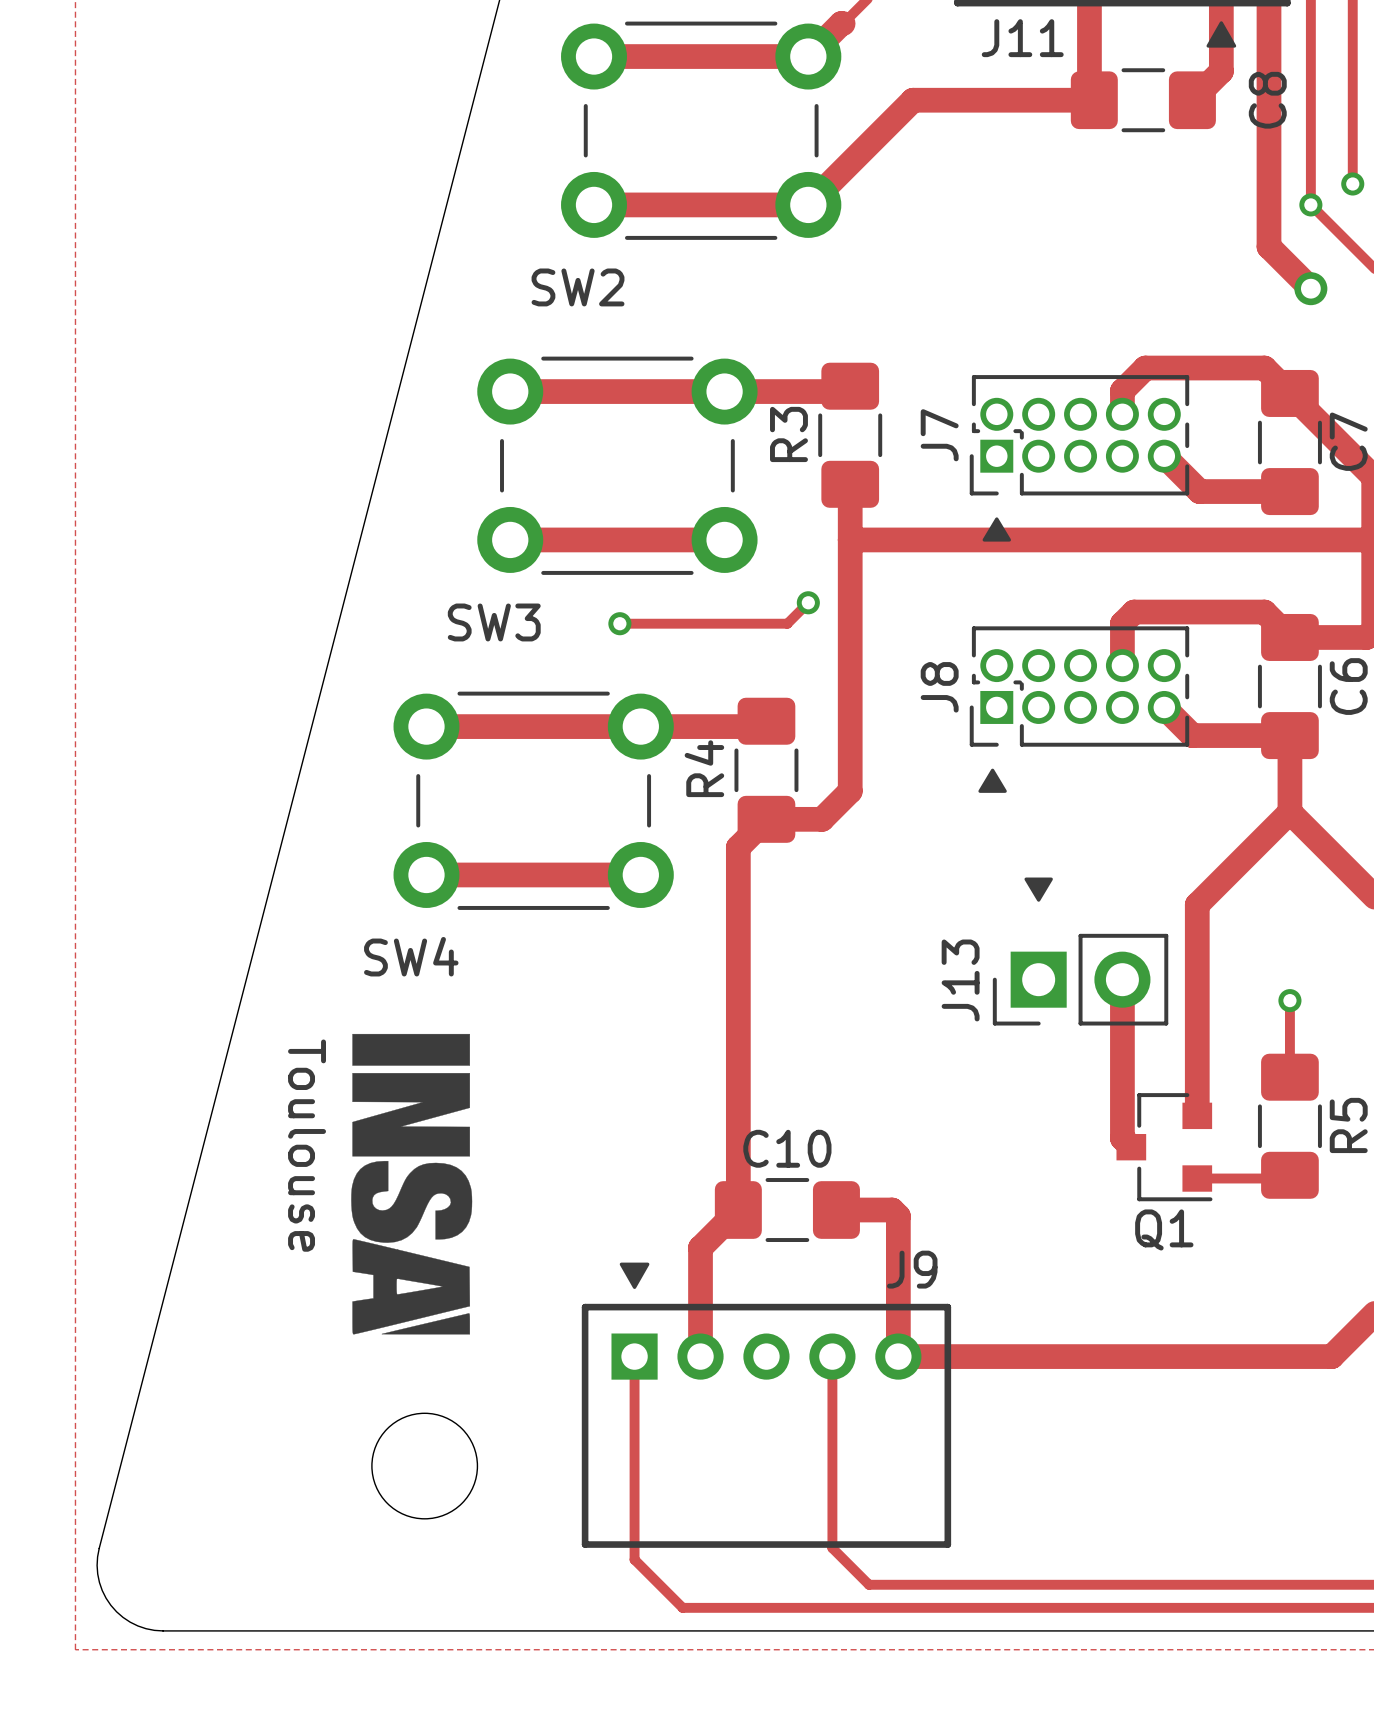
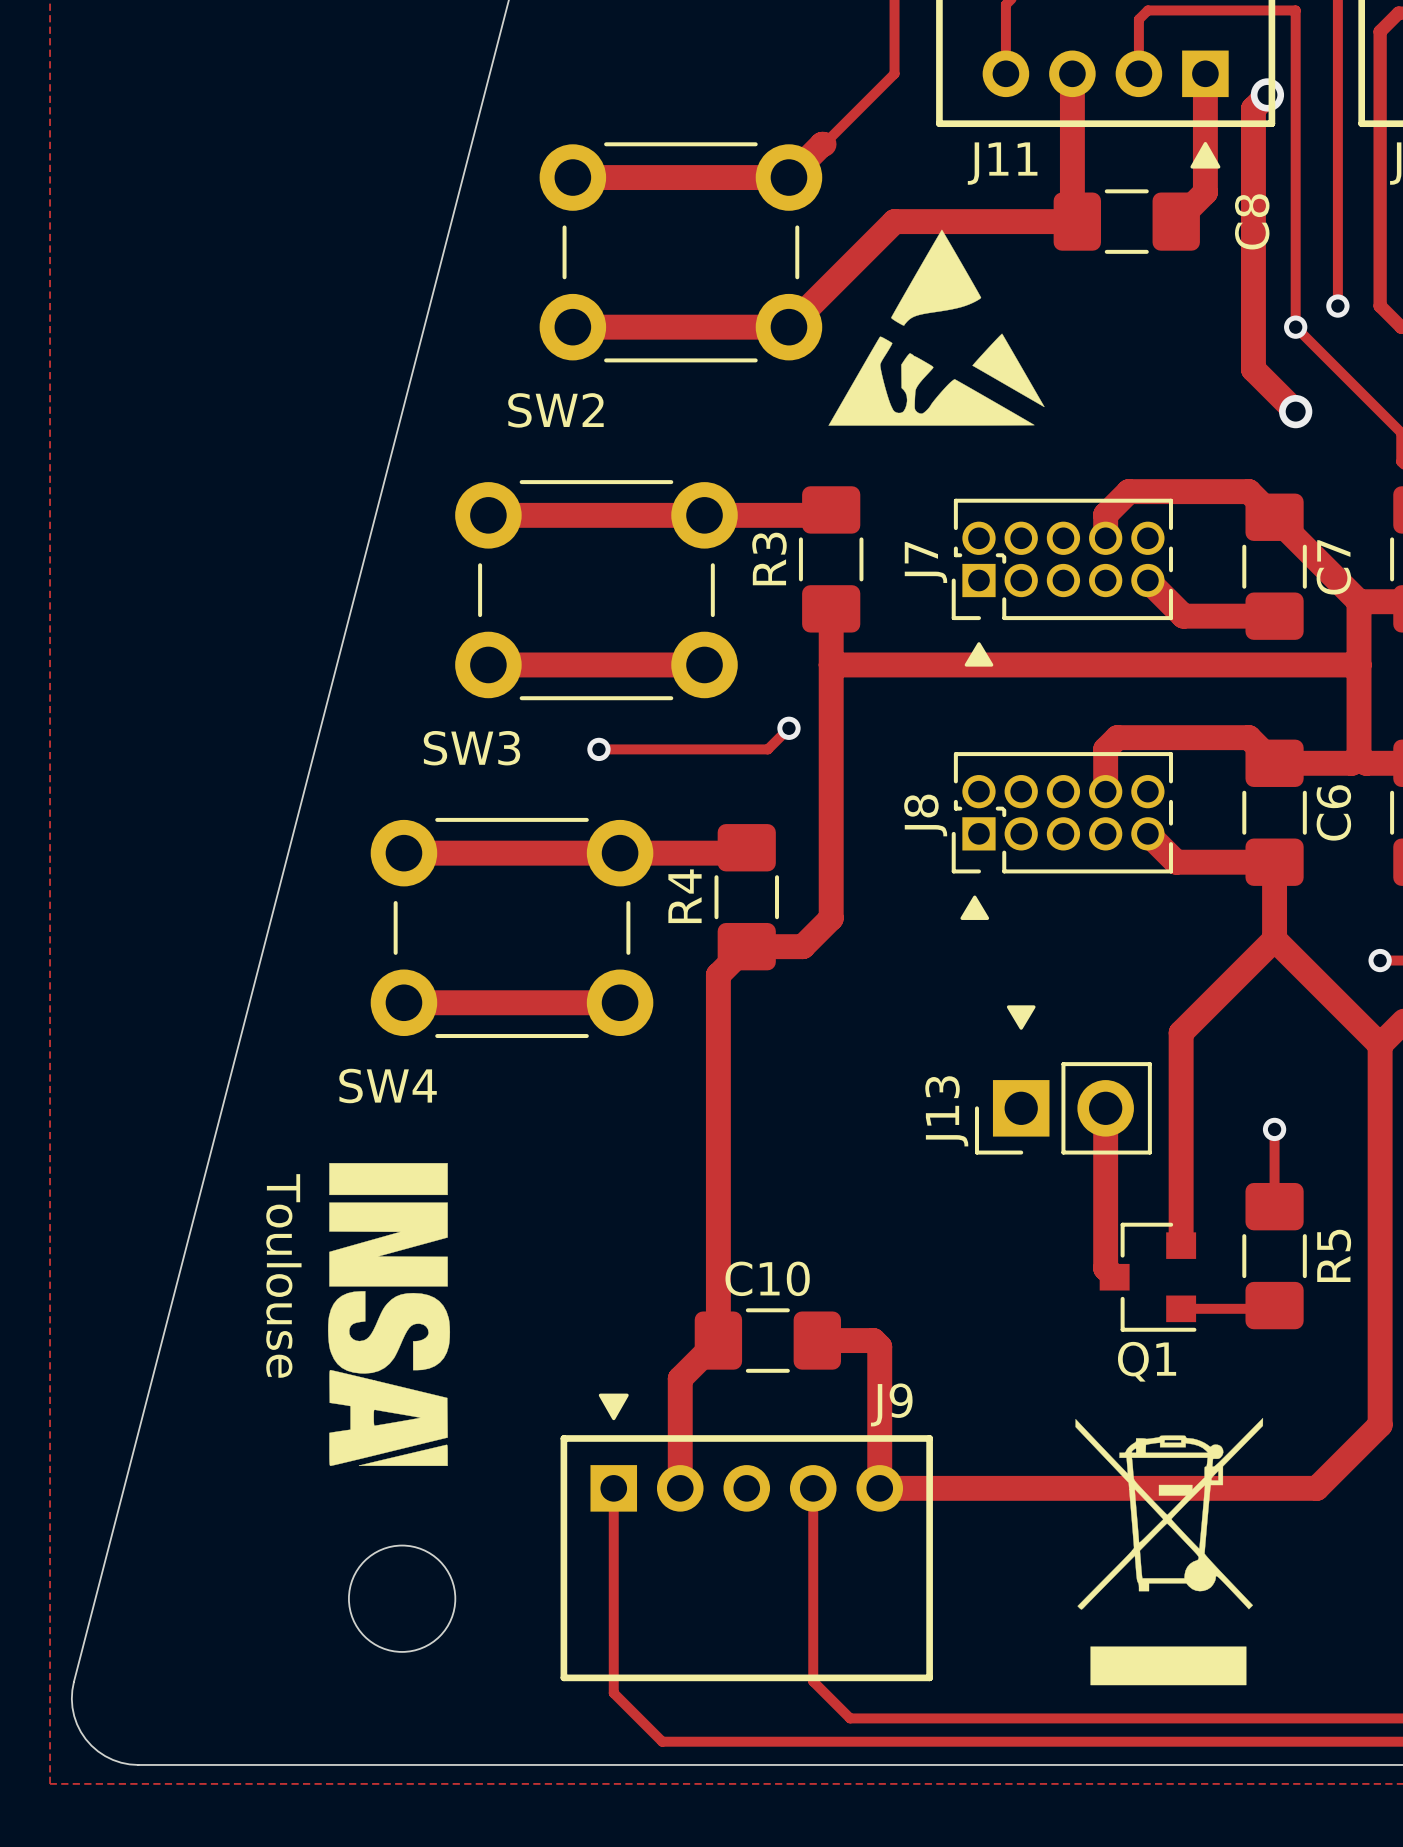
drawing: none -> [828, 229, 1045, 426]
drawing: none -> [1075, 1417, 1264, 1686]

